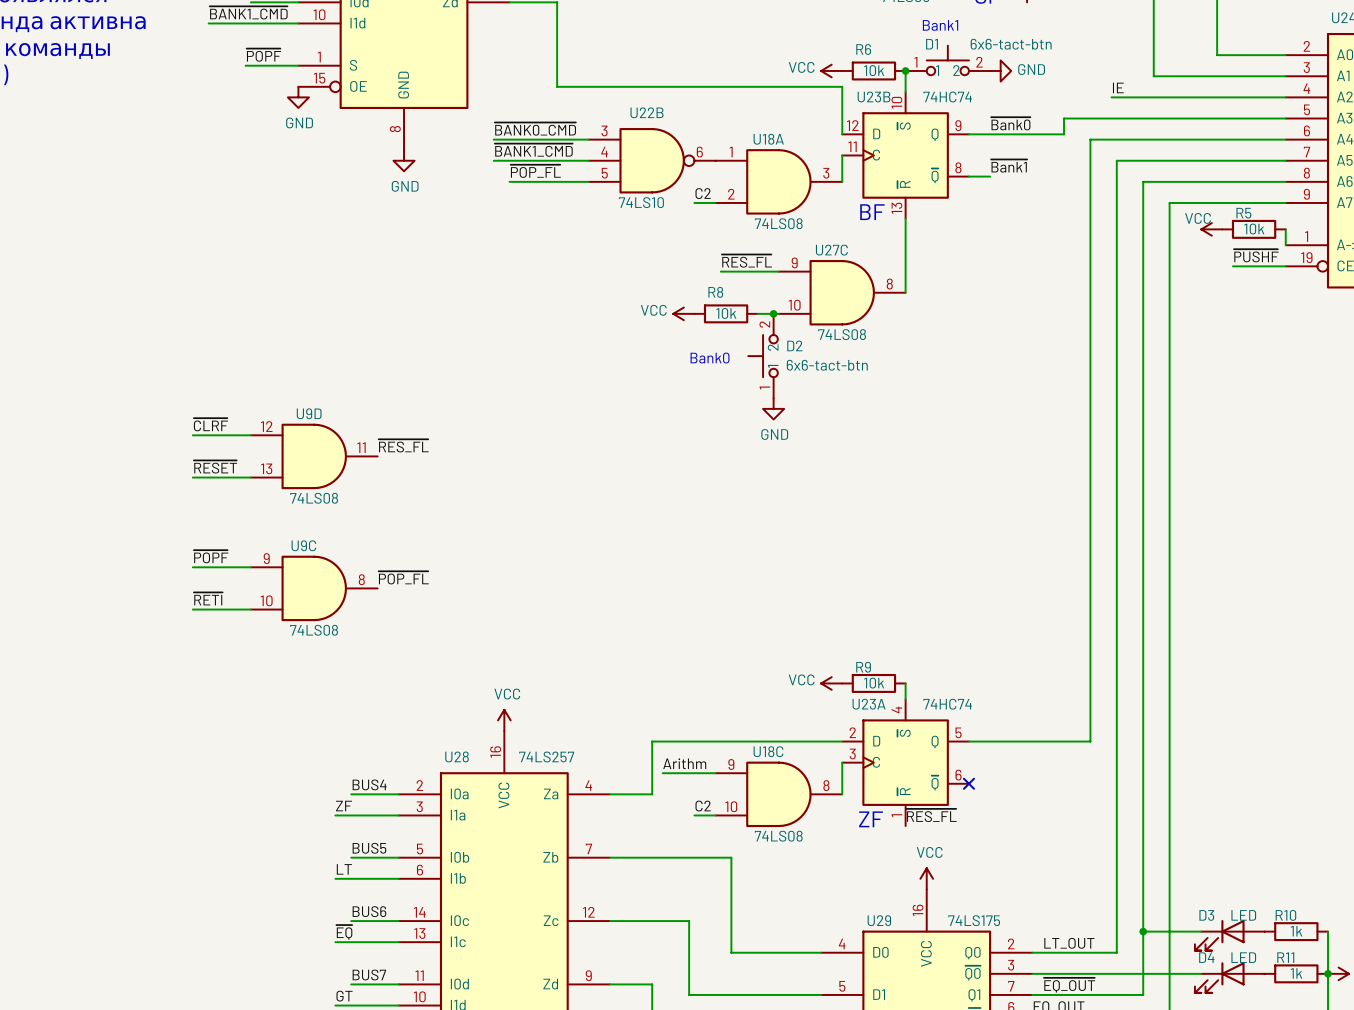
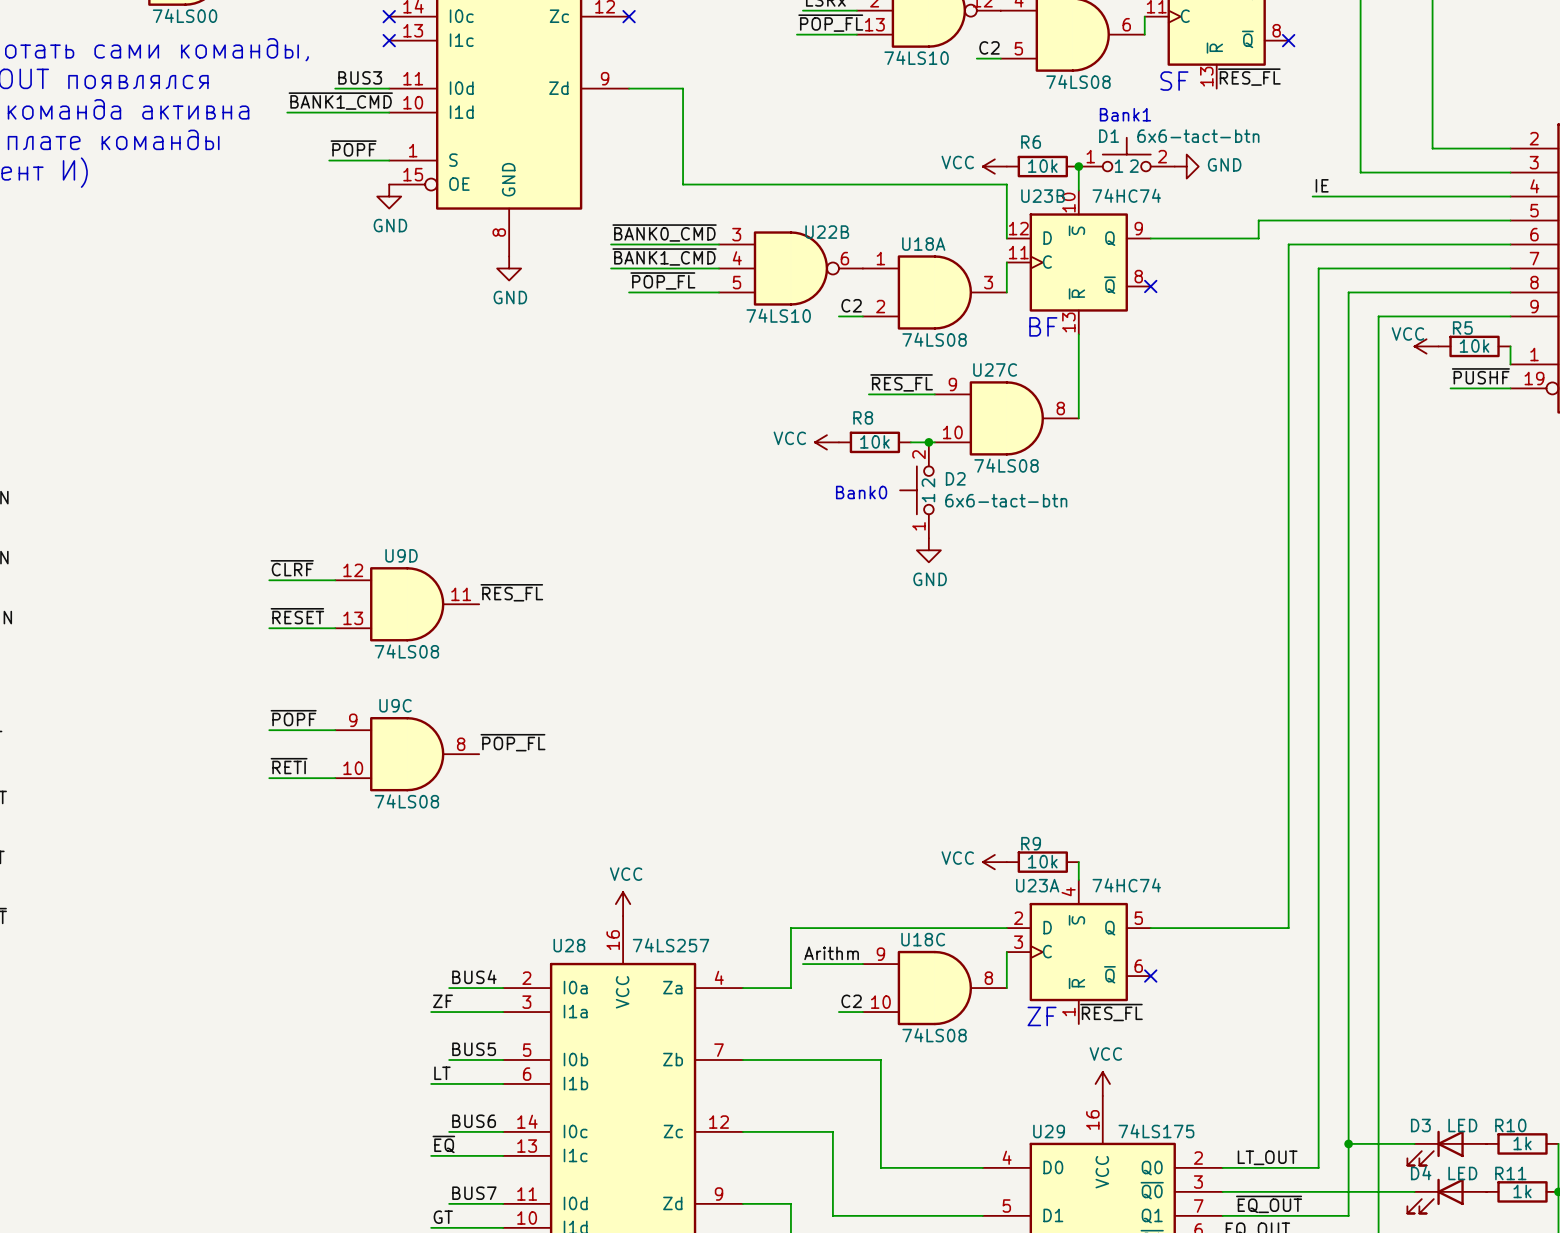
U22B name position: U22B (647, 112) -> U22B (827, 232)
label: ~{Bank0} (1010, 123) -> none
label: ~{Bank1} (1009, 166) -> none
wire: (968, 176) (990, 176) -> none
no-connect mark: none -> (1150, 286)

